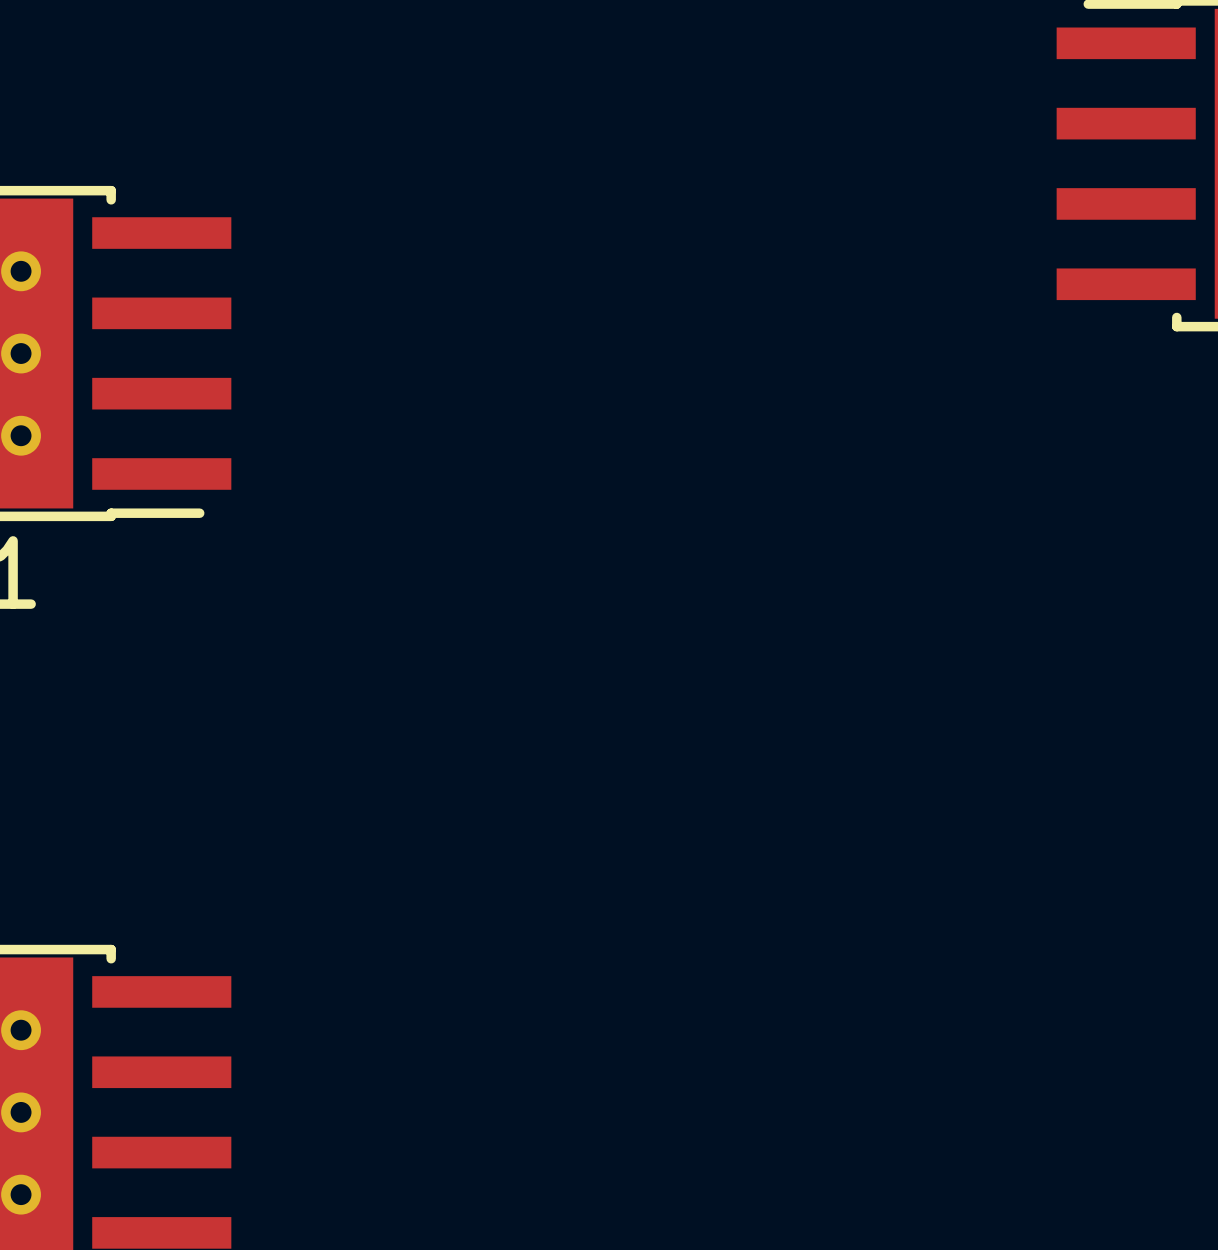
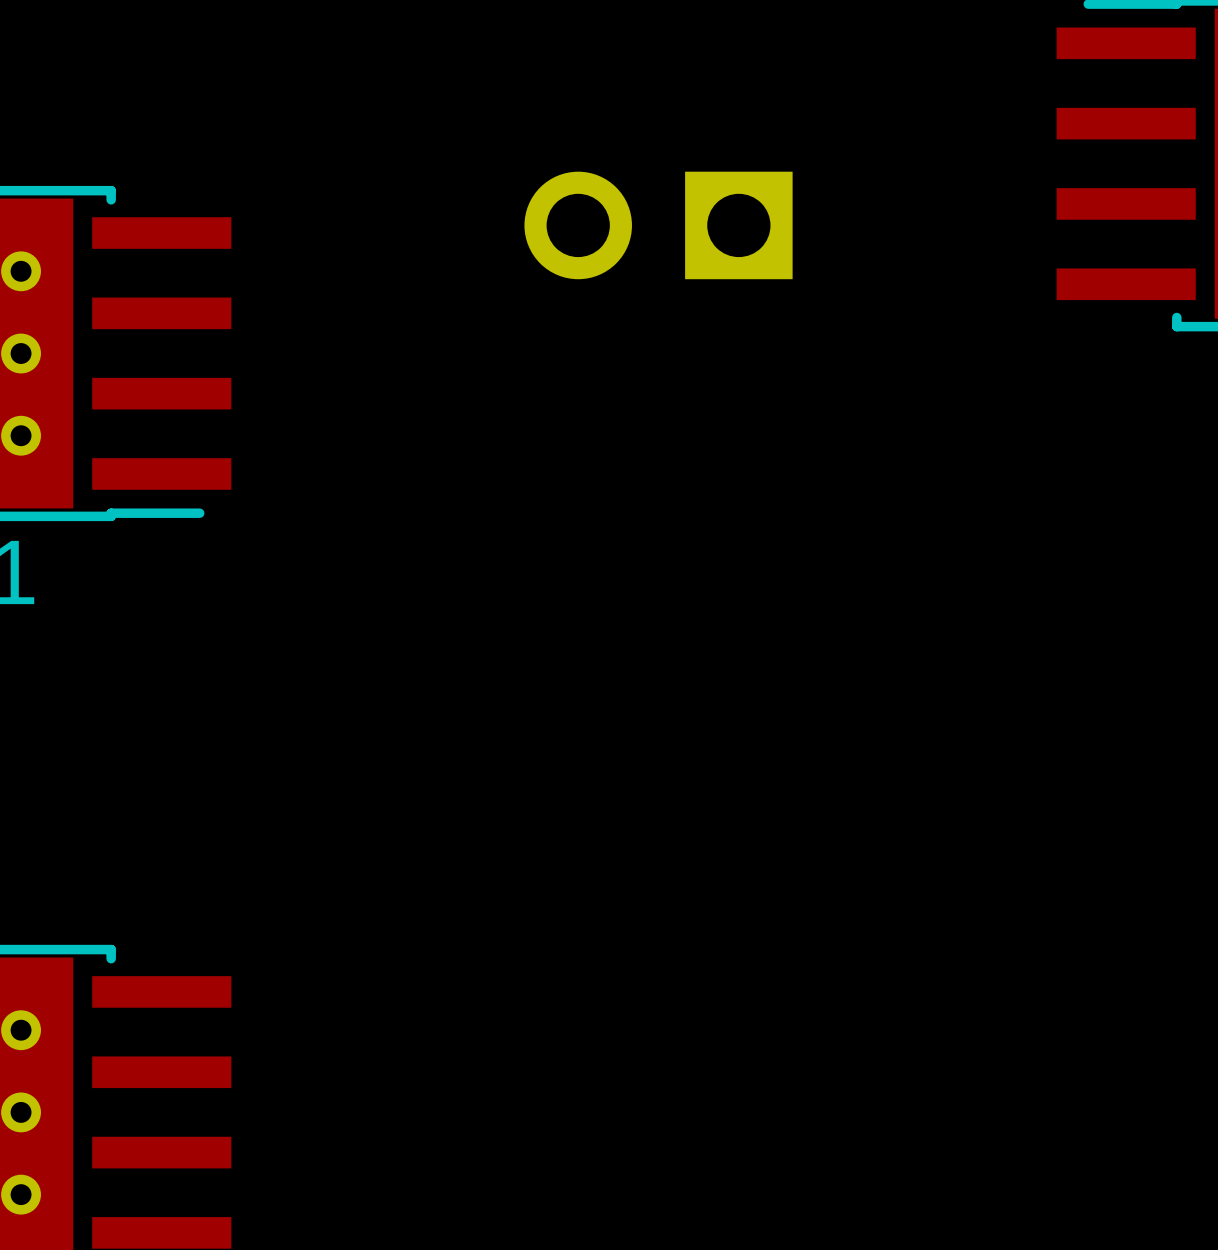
part: none -> (658, 225)

